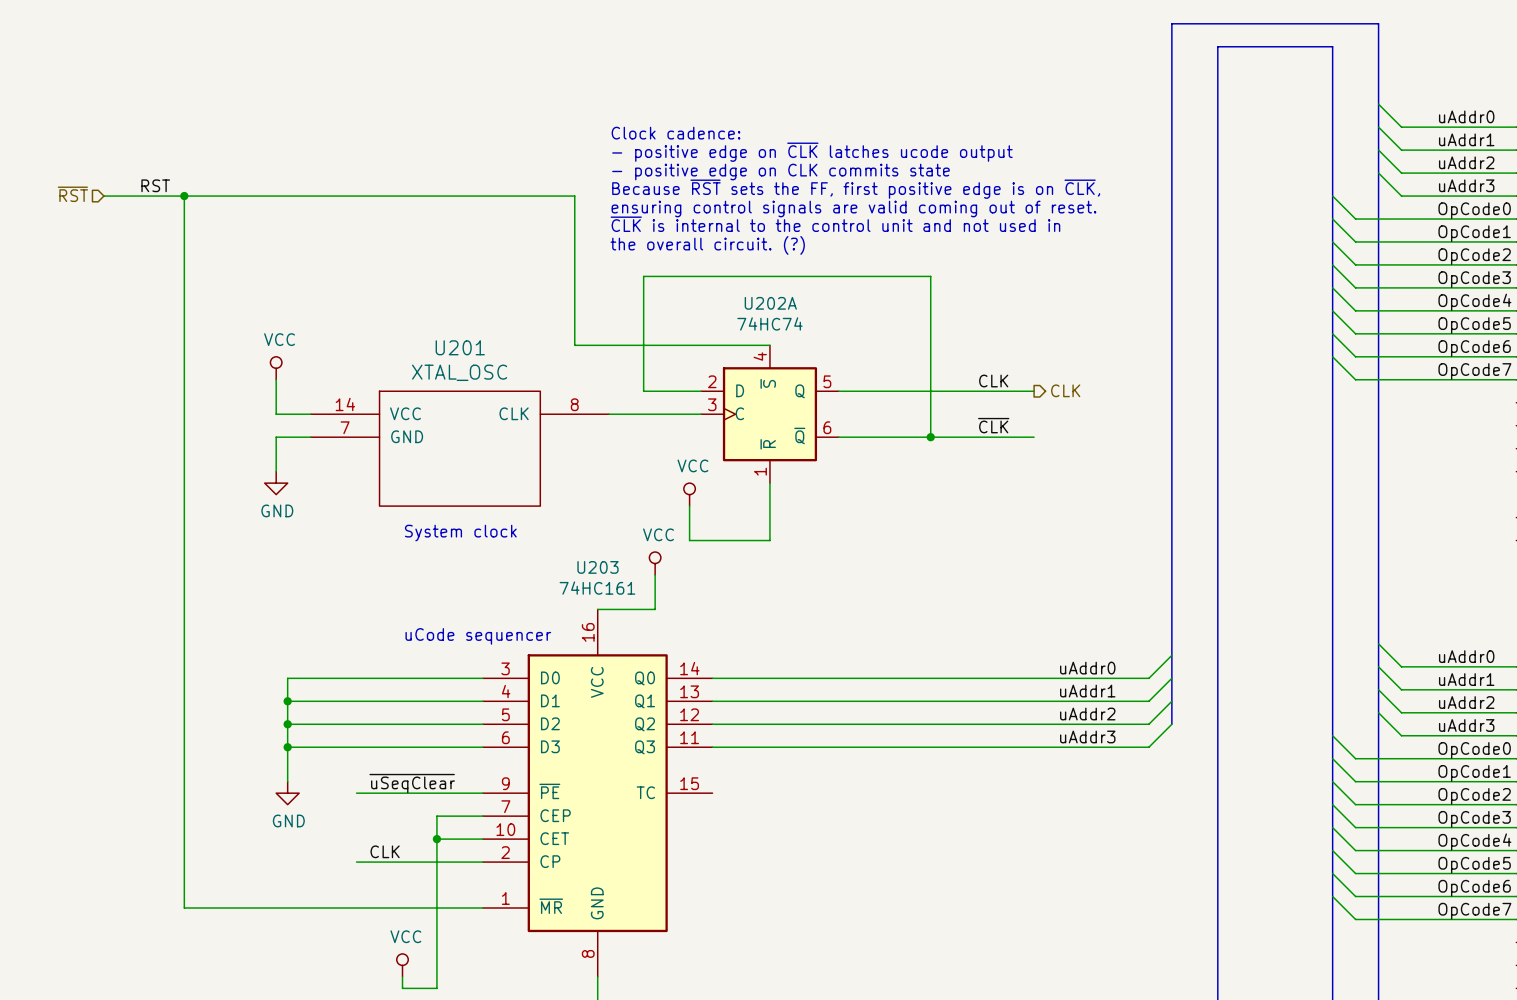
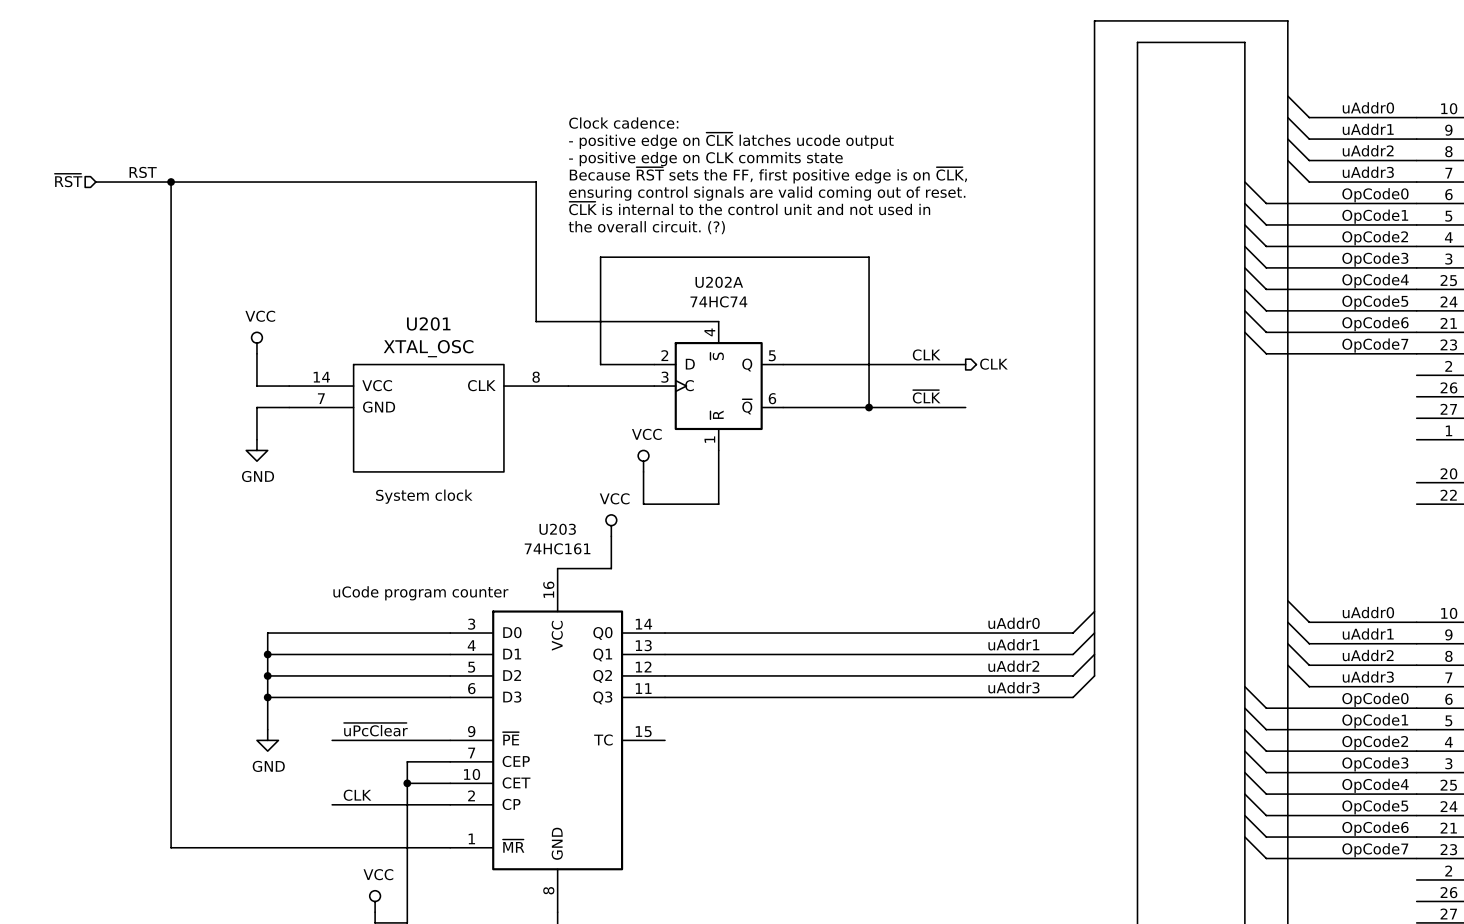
text: none -> uCode program counter (420, 593)
text: uCode sequencer (478, 636) -> none
label: ~{uSeqClear} (412, 783) -> ~{uPcClear} (375, 729)

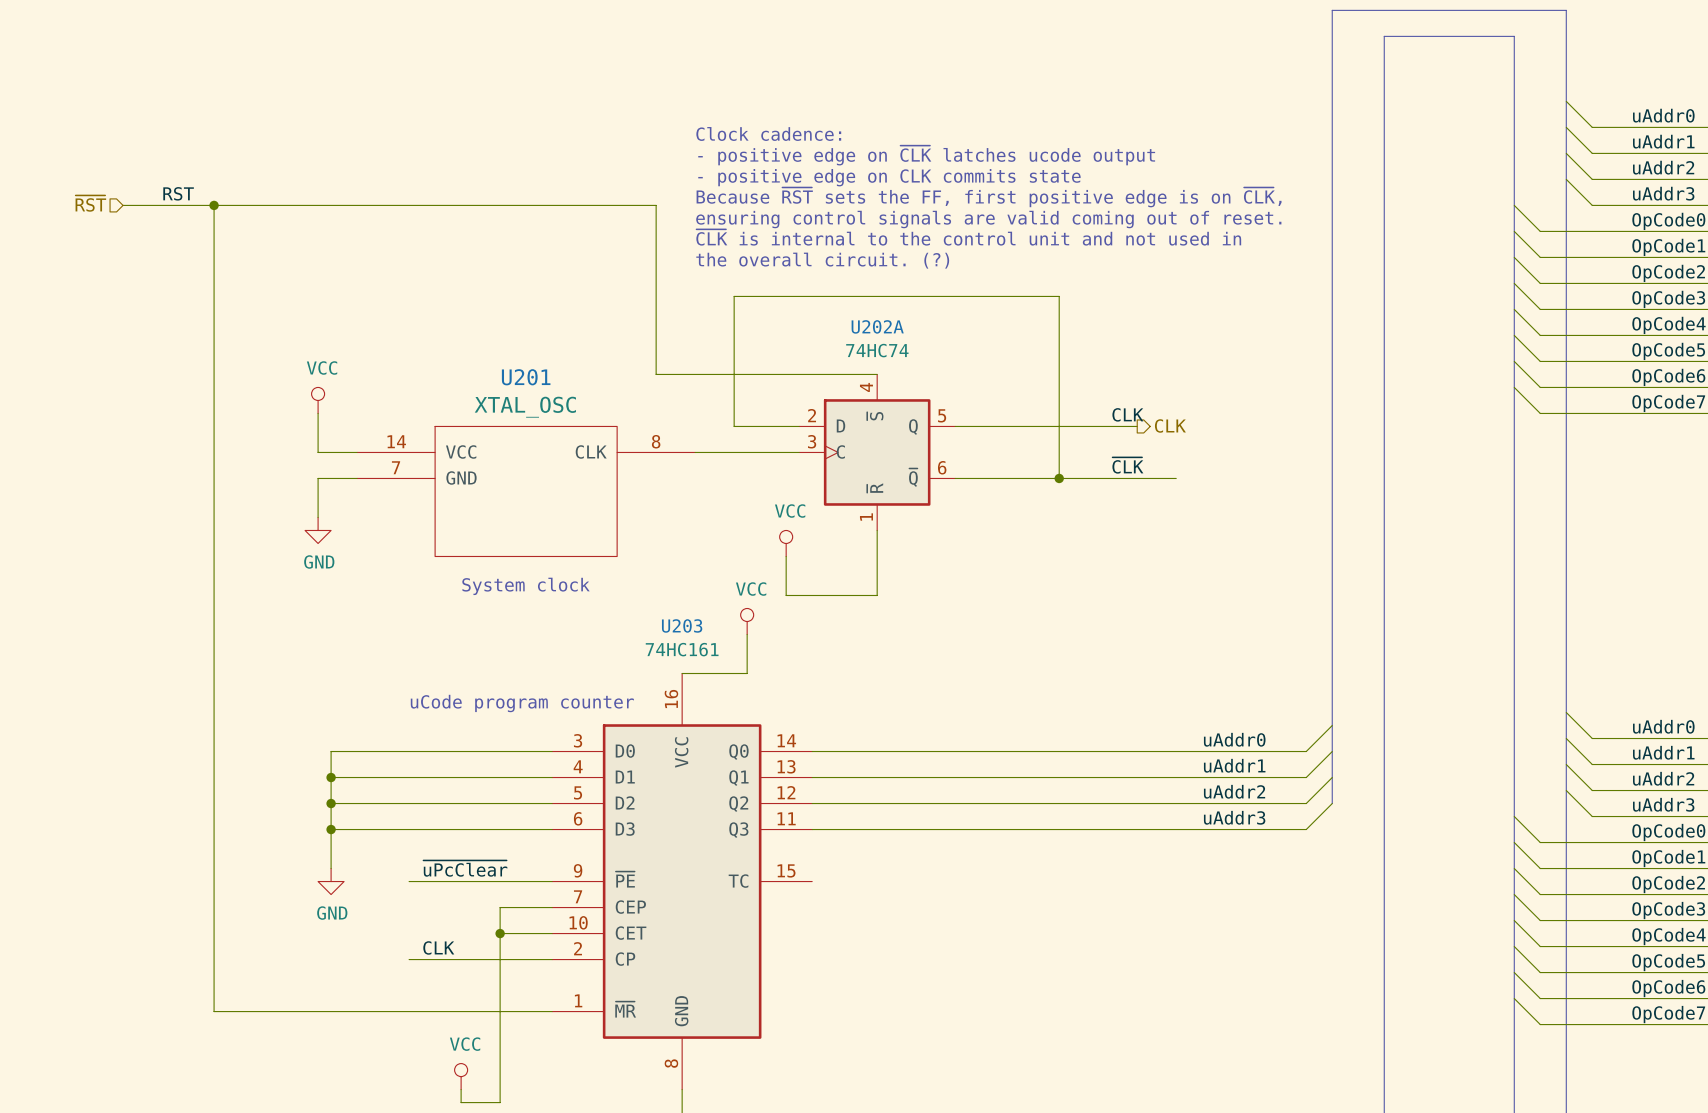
wire: (933, 364) (965, 364) -> none
hierarchical label position: CLK (993, 364) -> CLK (1170, 425)

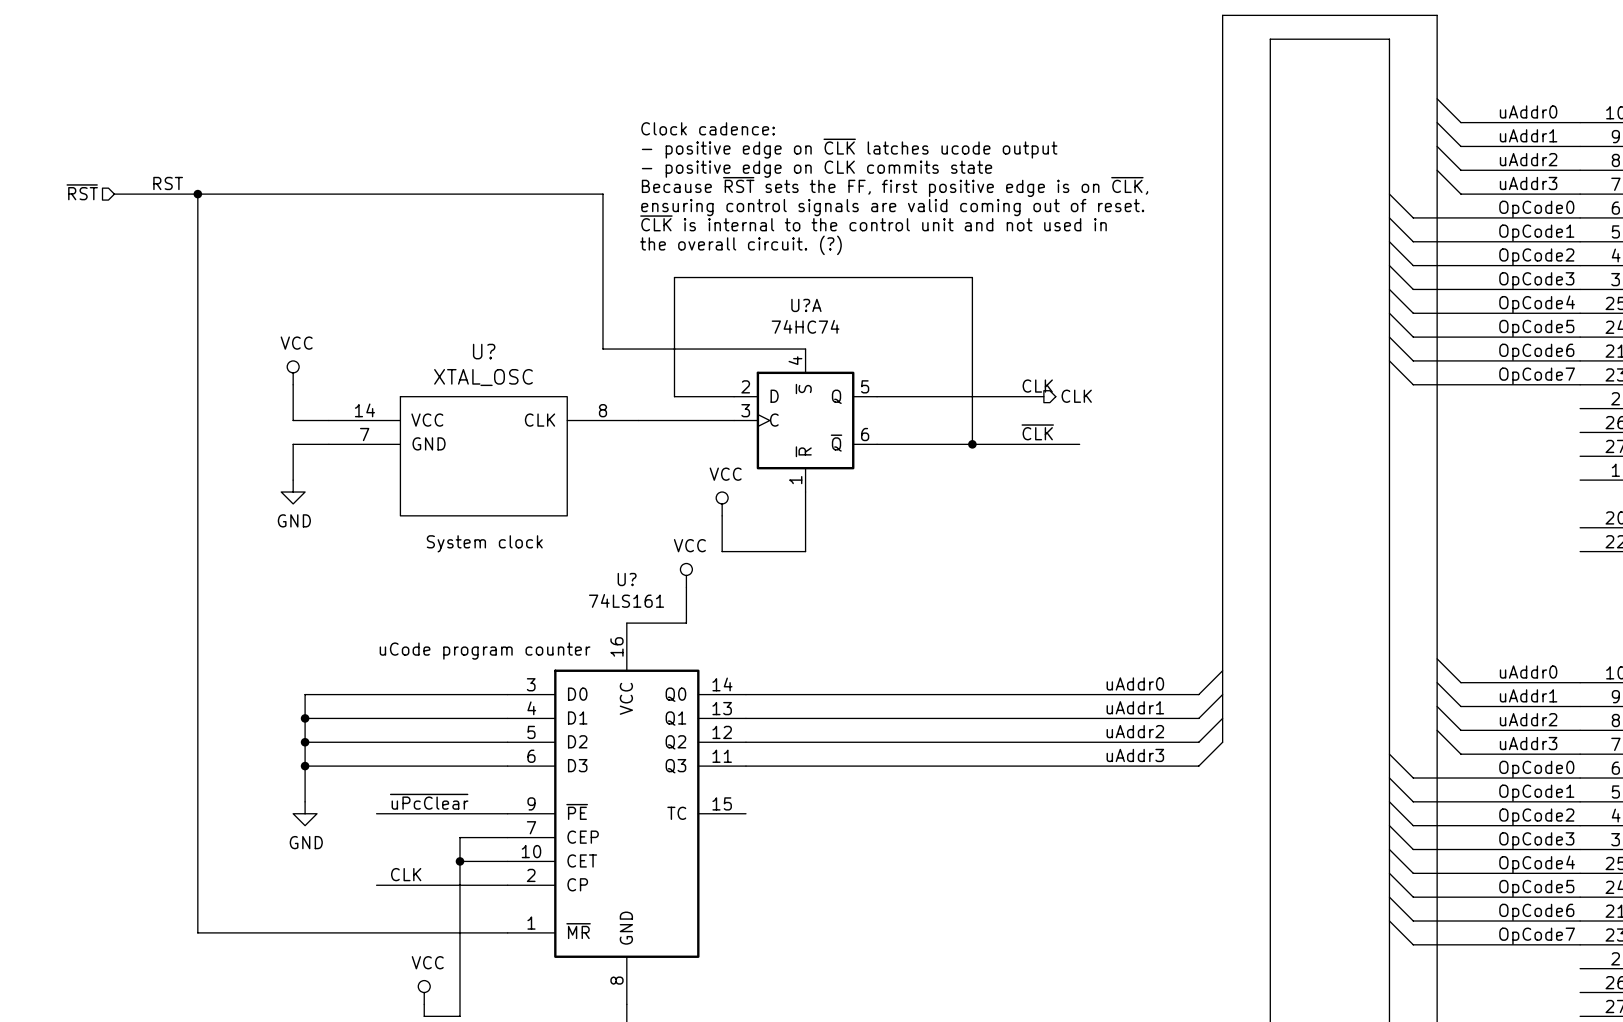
U202A name: U202A (877, 326) -> U?A (806, 305)
U201 name: U201 (526, 377) -> U? (484, 351)
U203 name: U203 (682, 625) -> U? (627, 579)
U203 value: 74HC161 (682, 649) -> 74LS161 (626, 600)

